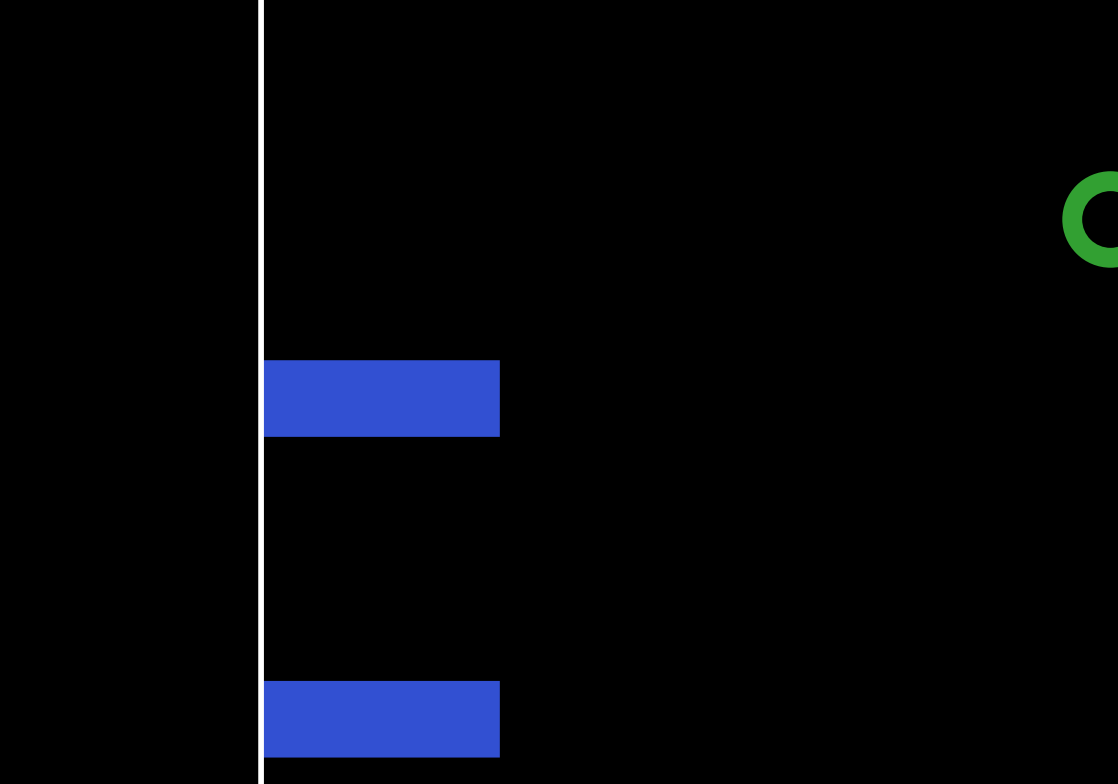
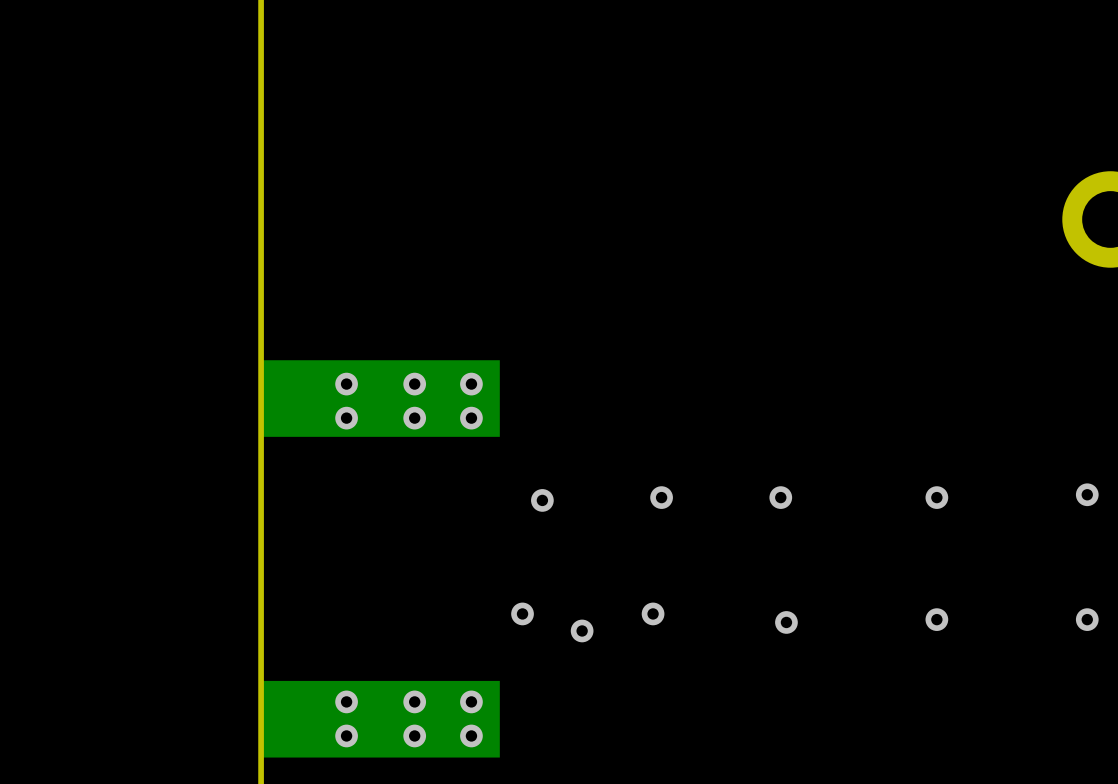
via: none -> (346, 384)
via: none -> (414, 384)
via: none -> (471, 384)
via: none -> (346, 418)
via: none -> (414, 418)
via: none -> (471, 418)
via: none -> (1087, 494)
via: none -> (661, 497)
via: none -> (780, 497)
via: none -> (936, 497)
via: none -> (542, 500)
via: none -> (522, 613)
via: none -> (653, 613)
via: none -> (936, 619)
via: none -> (1087, 619)
via: none -> (786, 622)
via: none -> (582, 630)
via: none -> (346, 701)
via: none -> (414, 701)
via: none -> (471, 701)
via: none -> (346, 735)
via: none -> (414, 735)
via: none -> (471, 735)

